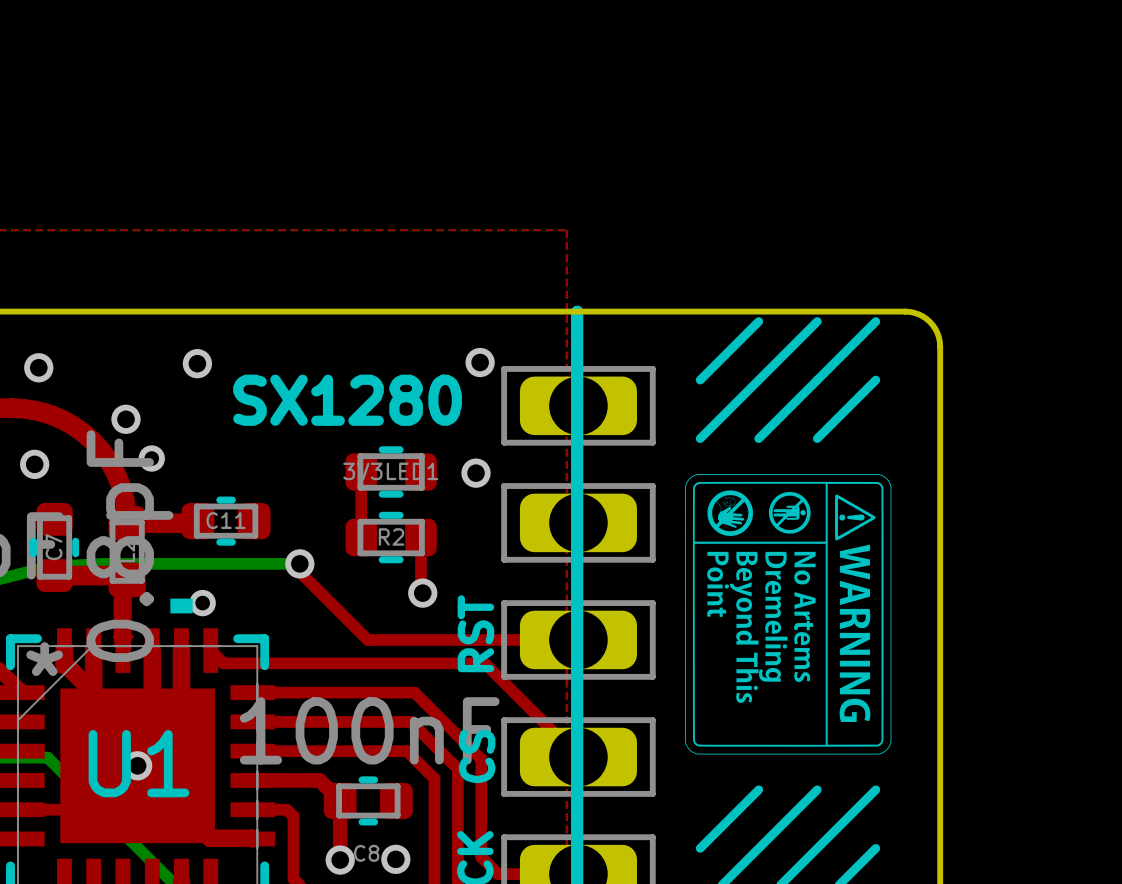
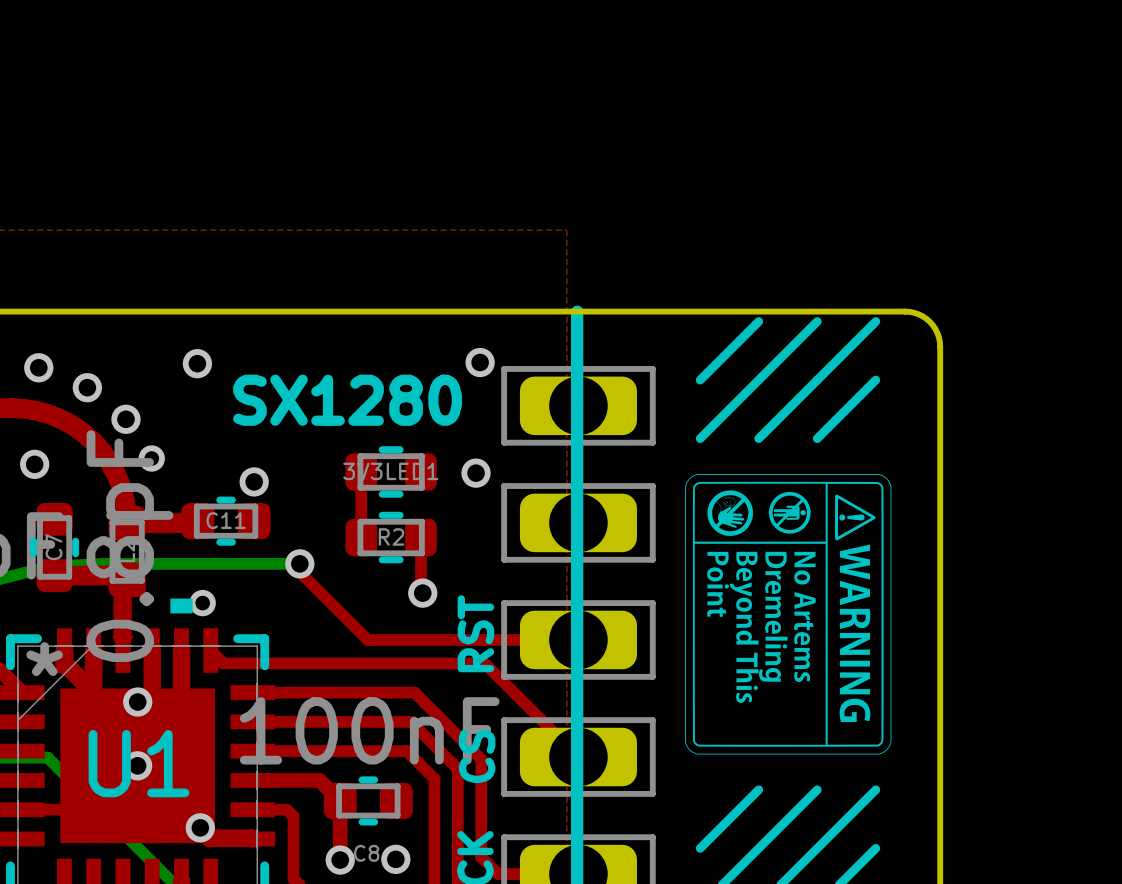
via: none -> (87, 387)
via: none -> (254, 481)
via: none -> (137, 702)
via: none -> (200, 827)

